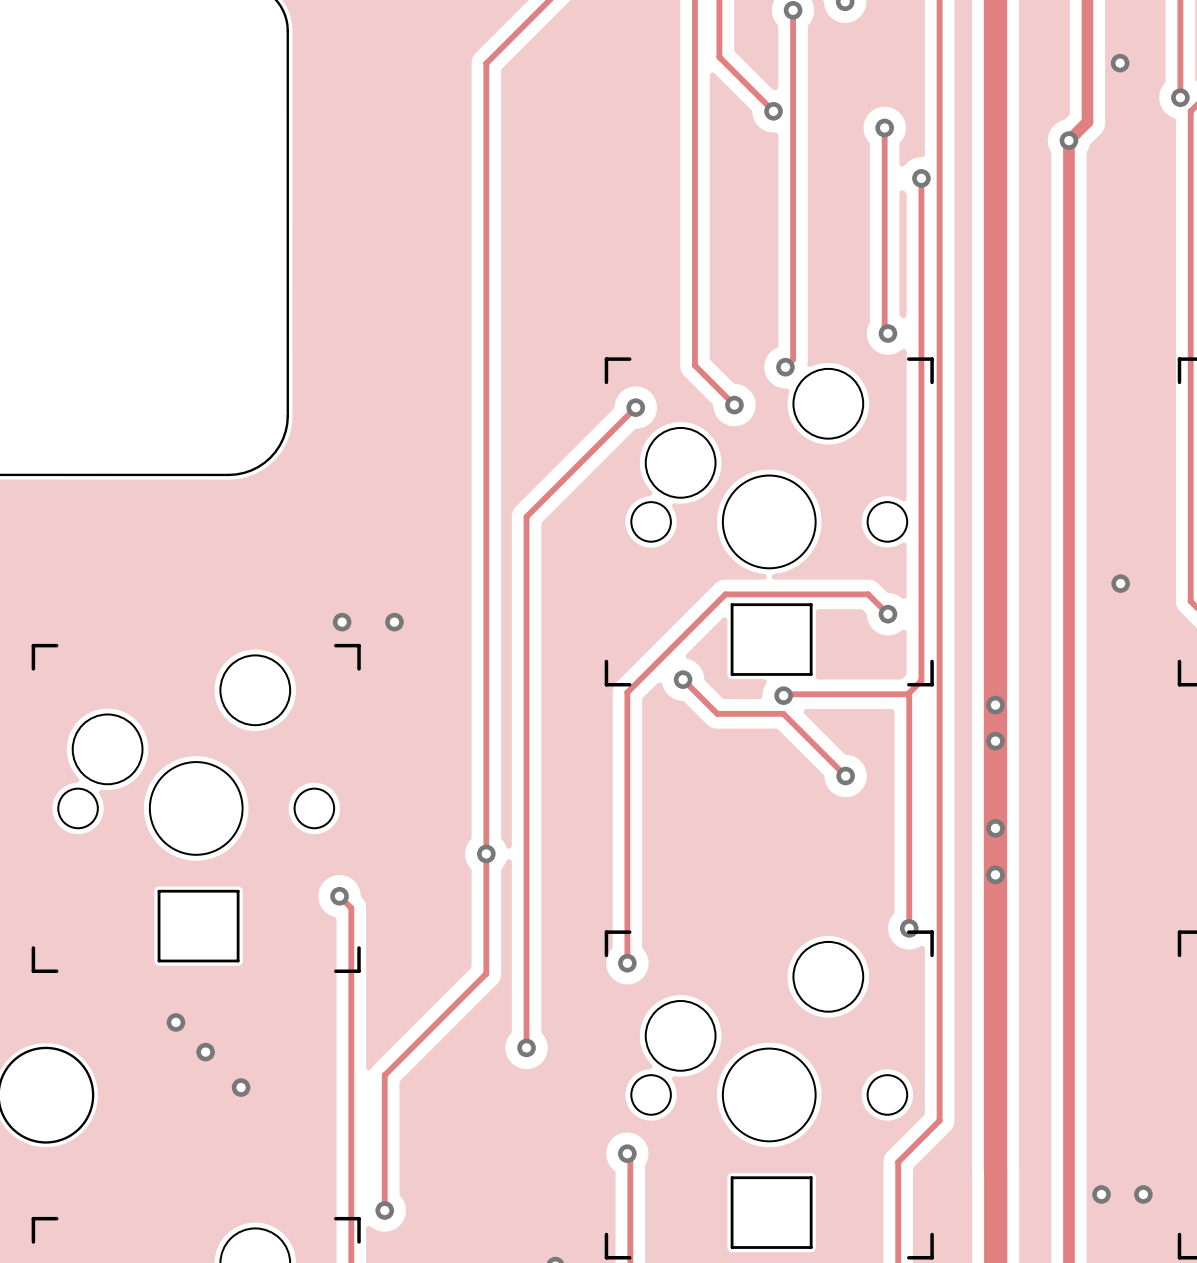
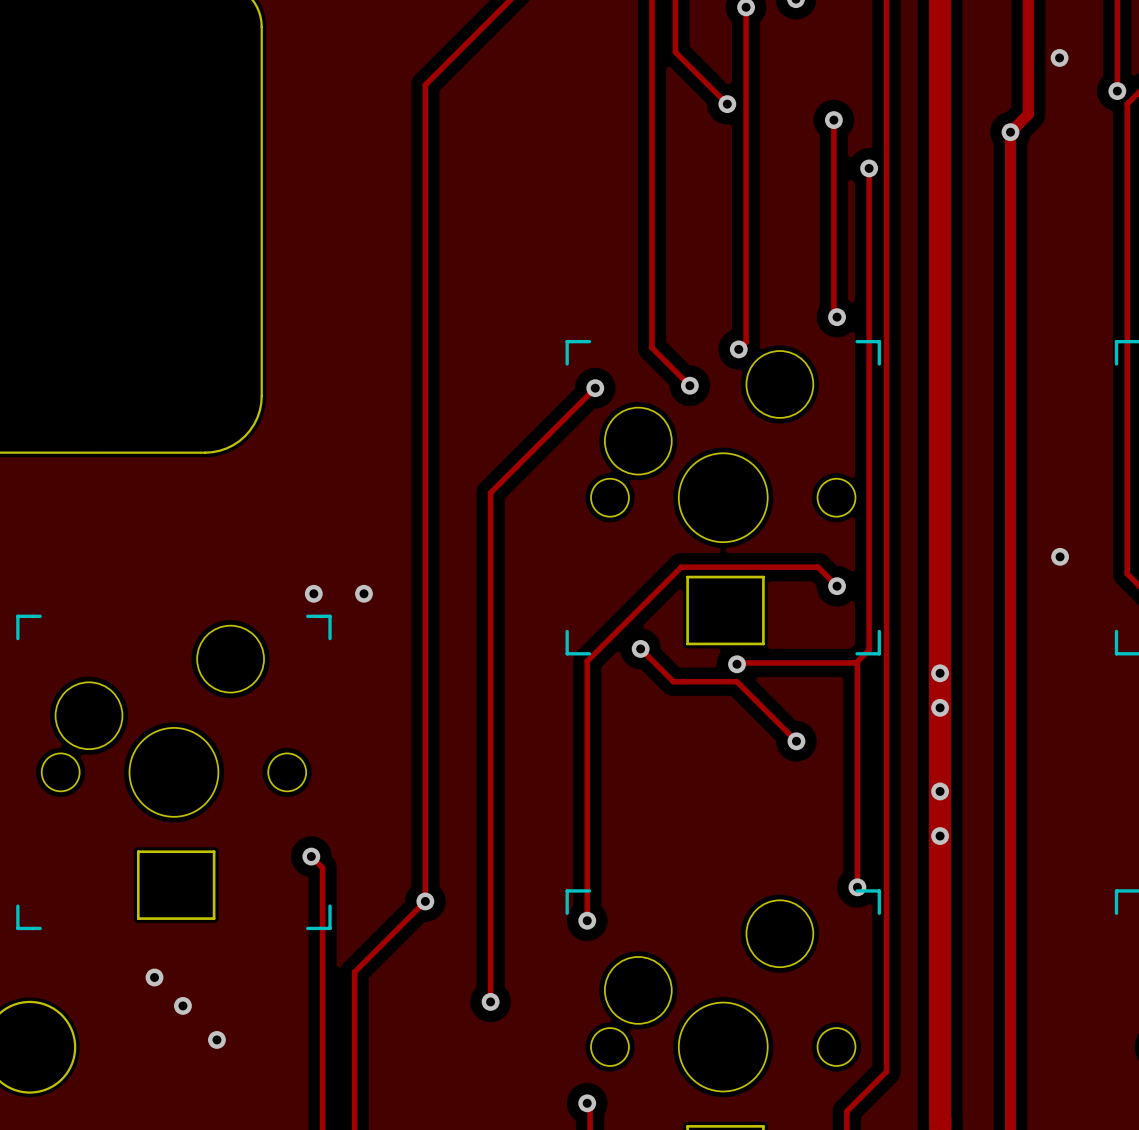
track: (486, 63) (486, 973) (384, 1075) -> (452, 58) (425, 84) (425, 901) (354, 972) (354, 1028)
via position: (486, 853) -> (425, 901)

